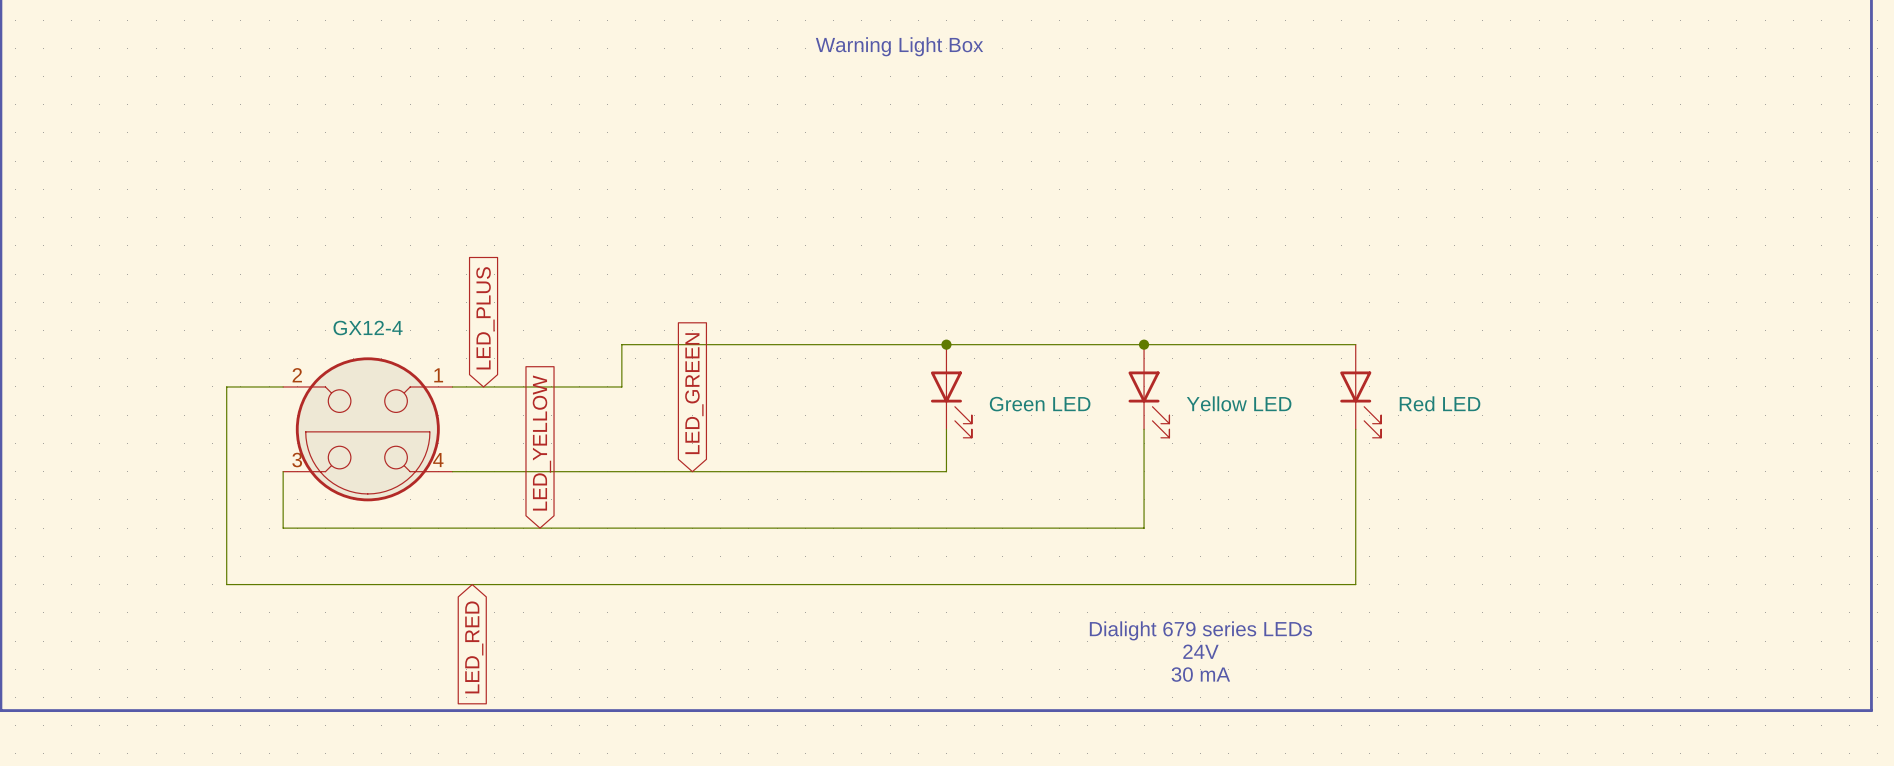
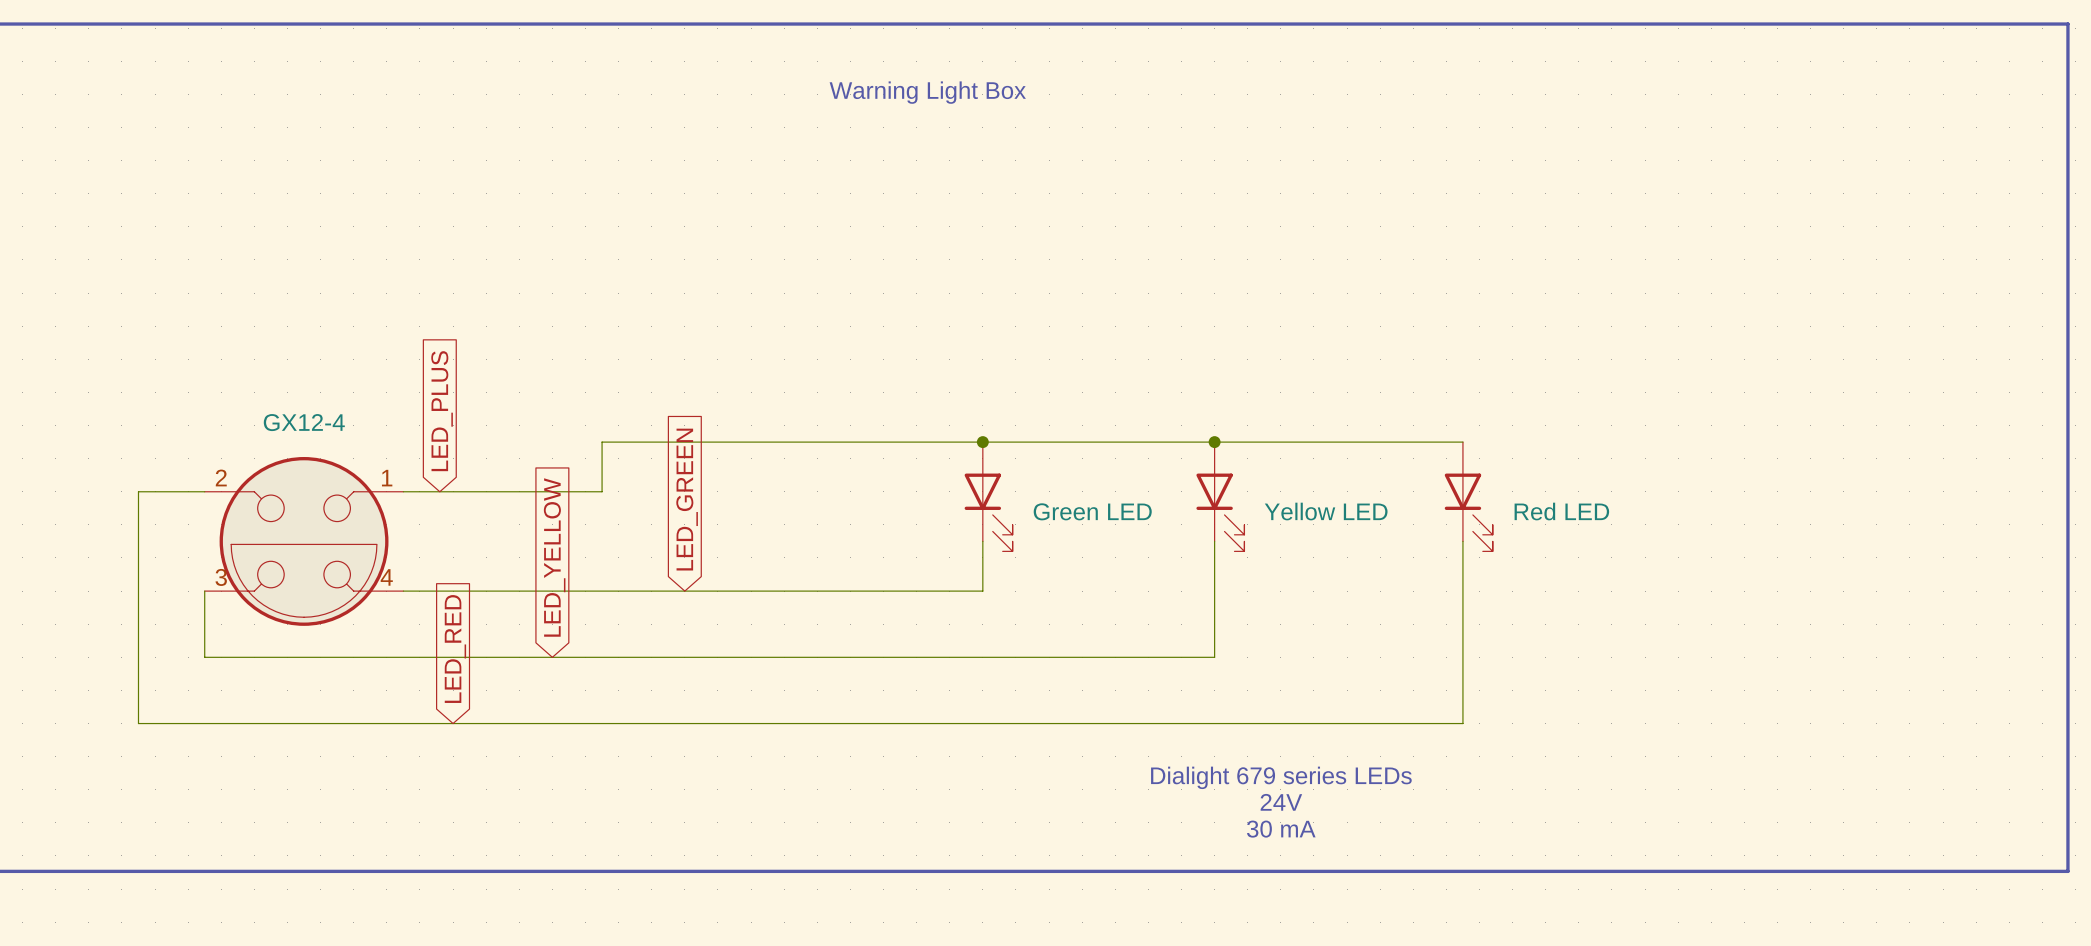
global label position: LED_YELLOW (541, 443) -> LED_YELLOW (554, 557)
global label rotation: 0° (474, 647) -> 180° (455, 649)
global label position: LED_RED (474, 647) -> LED_RED (455, 649)

